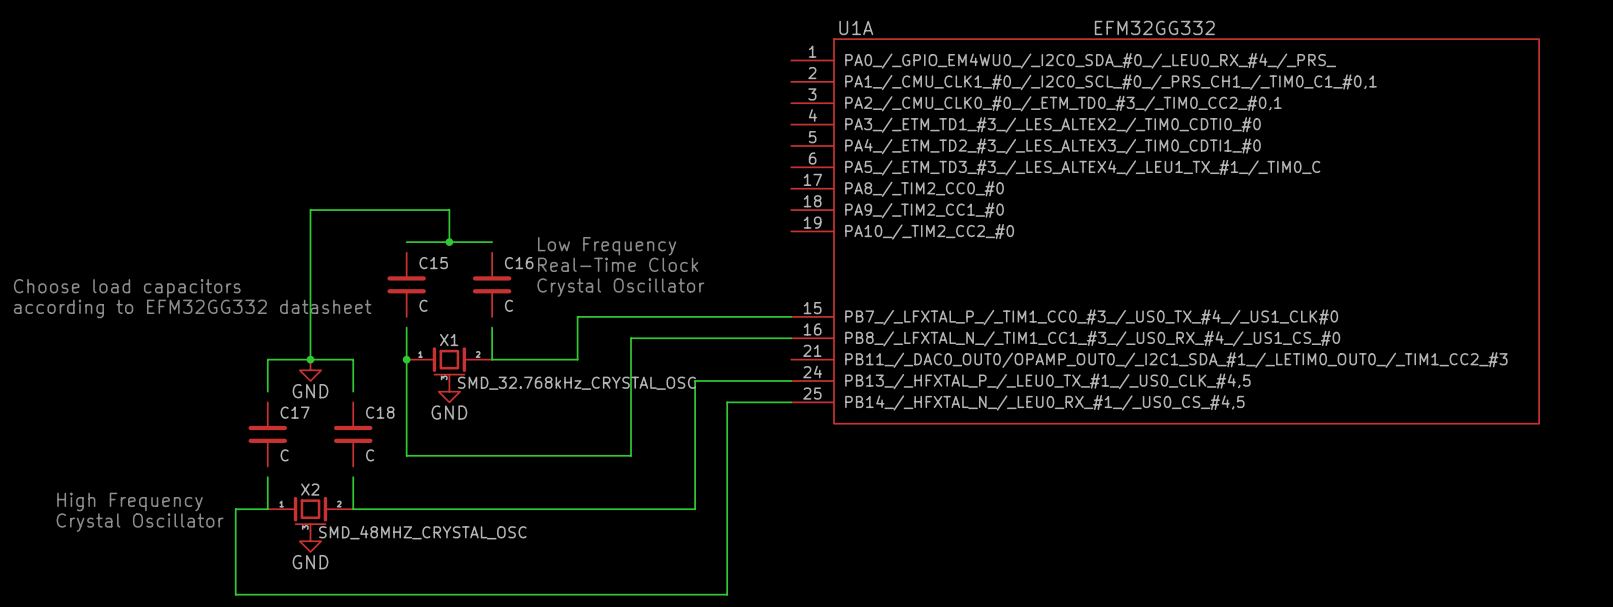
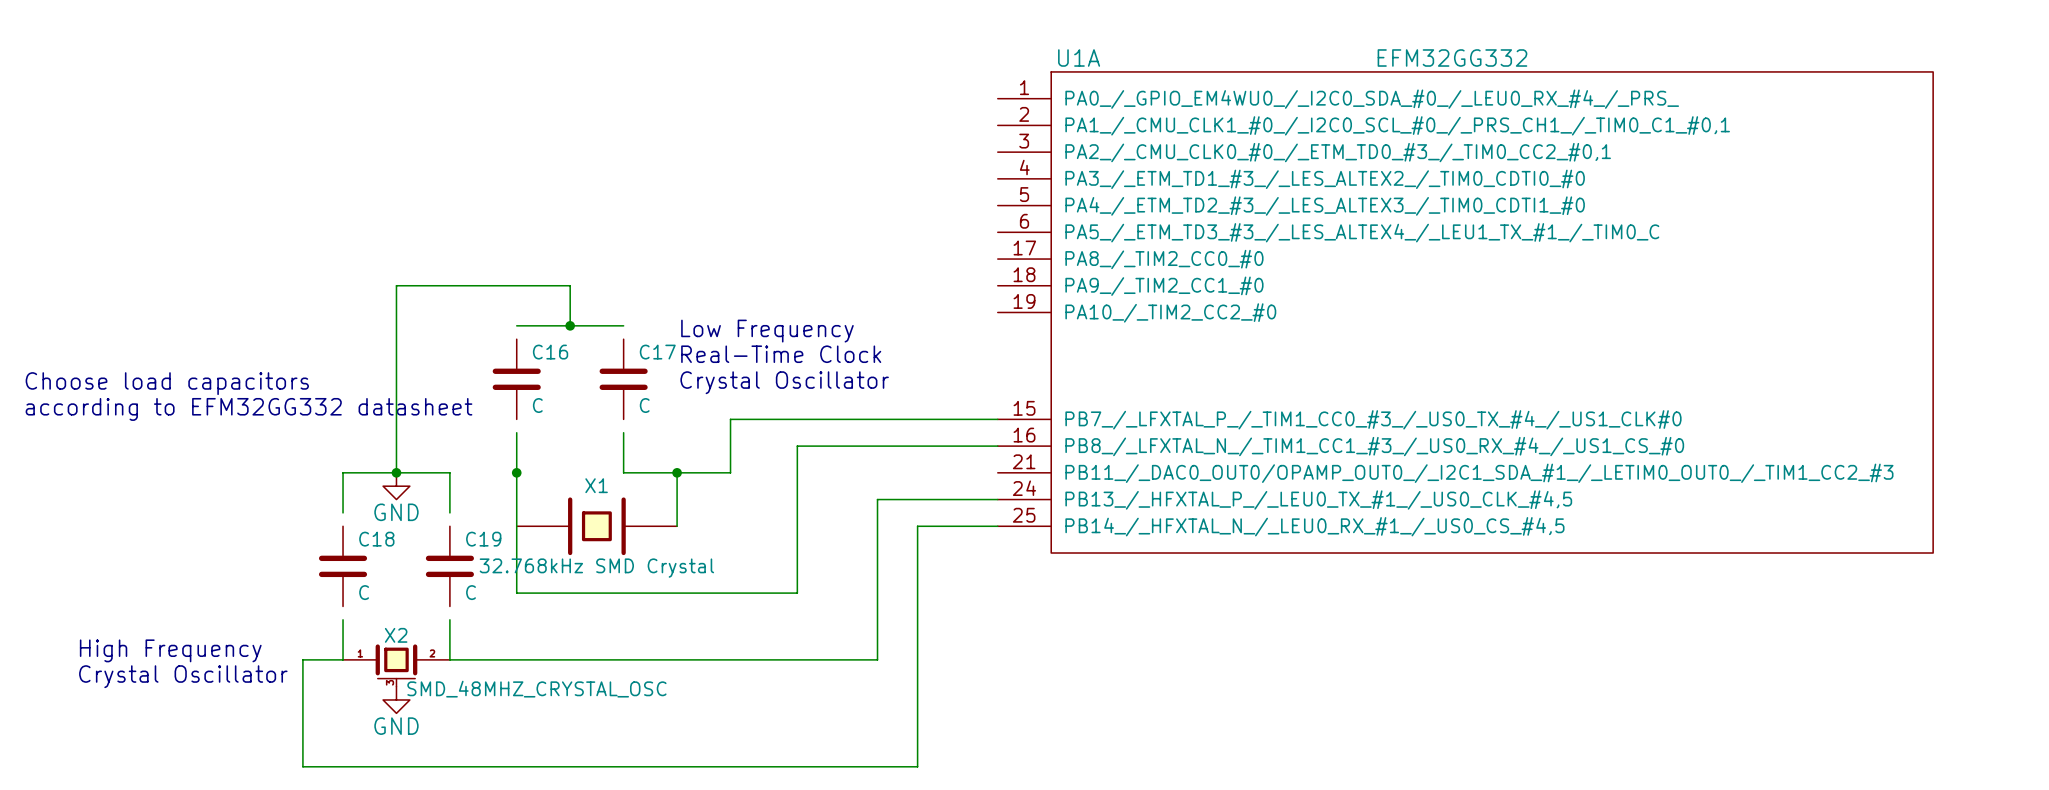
C15 name: C15 (433, 263) -> C16 (550, 352)
C16 name: C16 (519, 263) -> C17 (657, 352)
X1 symbol: [406, 347, 493, 382] -> [516, 497, 678, 556]
wire: none -> (677, 472) (677, 526)
junction: none -> (677, 472)
X1 value: SMD_32.768kHz_CRYSTAL_OSC (576, 383) -> 32.768kHz SMD Crystal (596, 568)
power symbol: GND (449, 391) -> none
C17 name: C17 (295, 412) -> C18 (376, 539)
C18 name: C18 (380, 412) -> C19 (483, 539)

